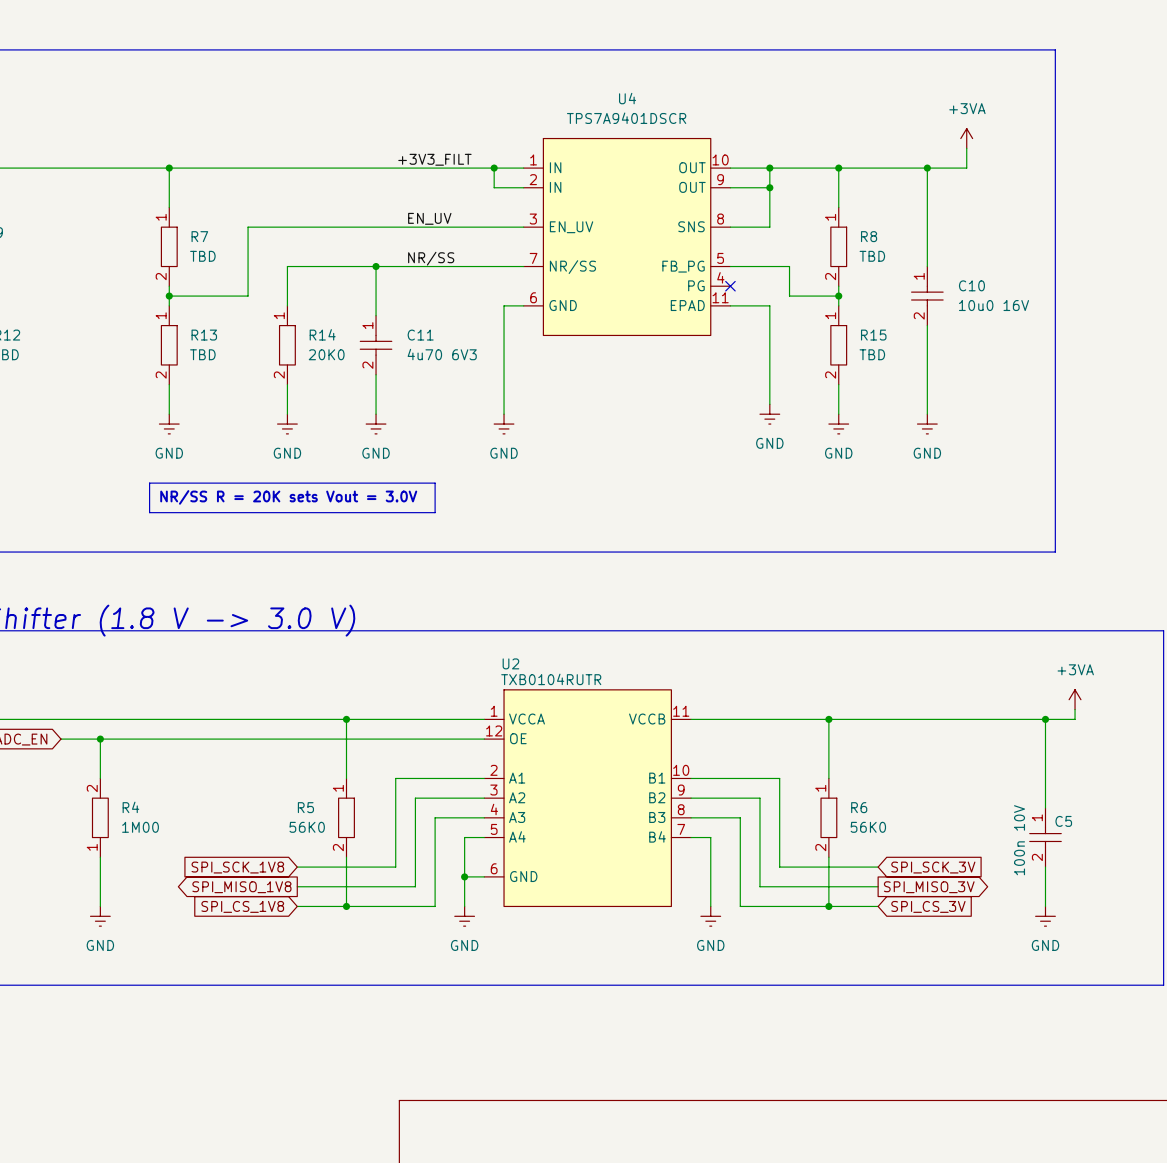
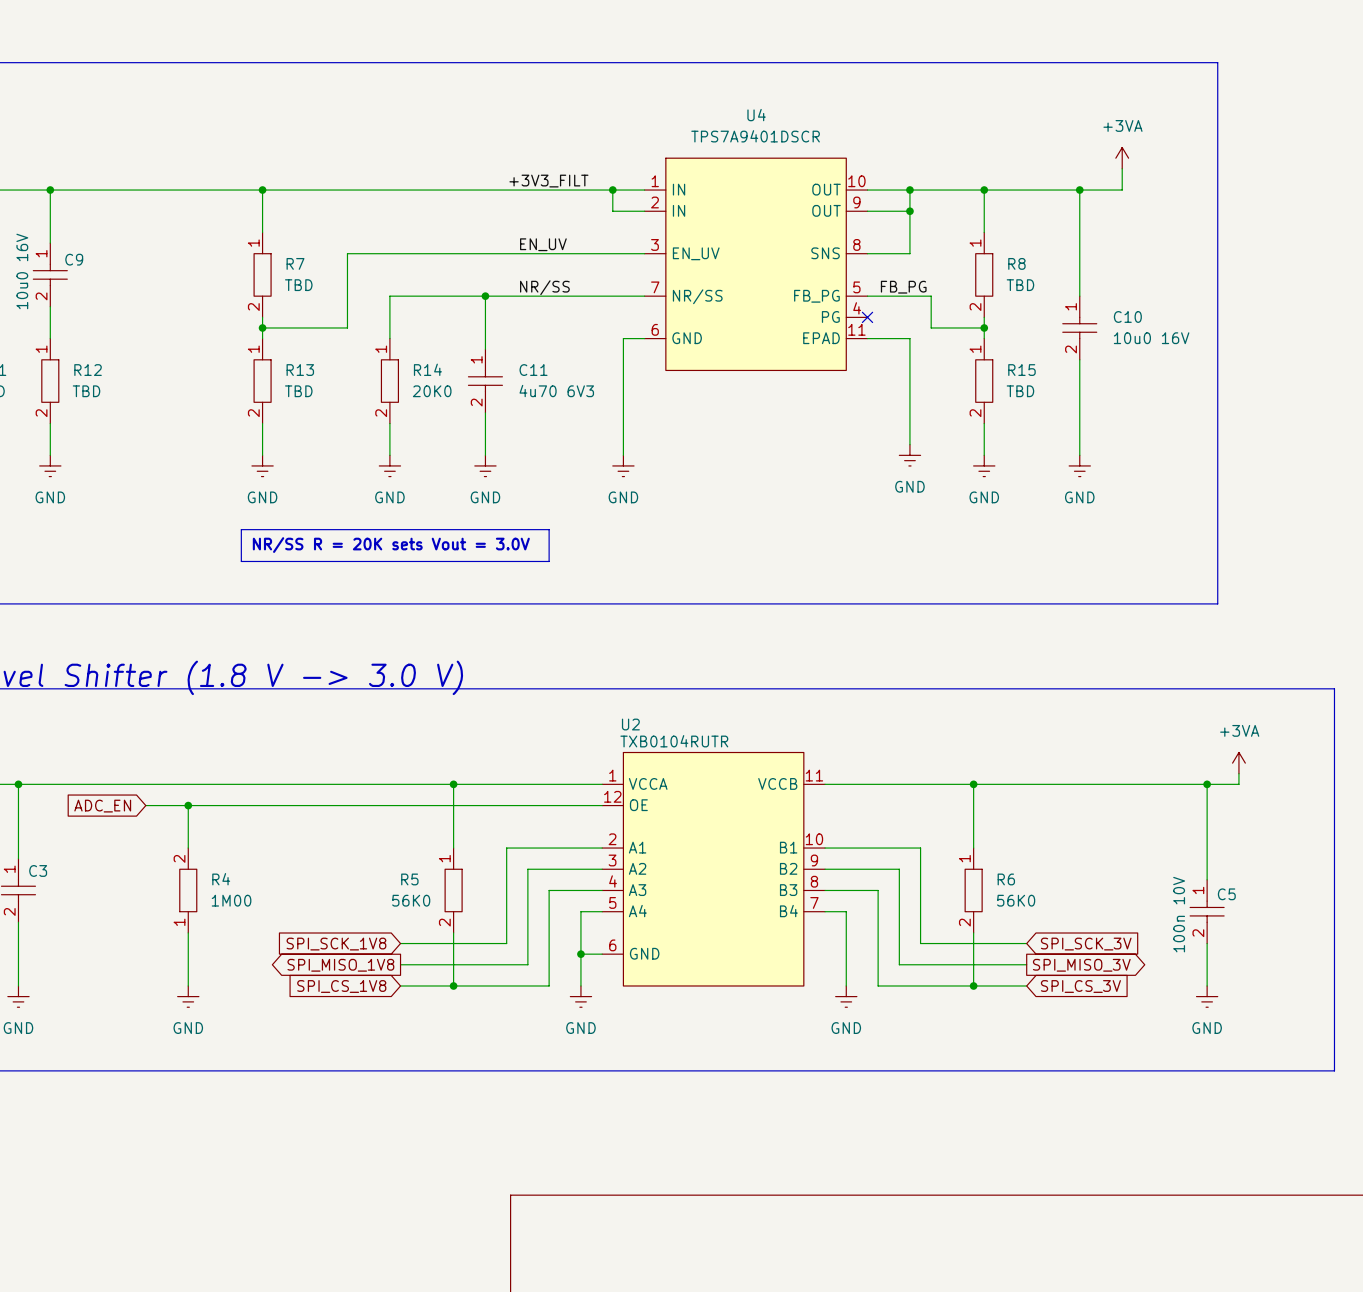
label: none -> FB_PG (903, 287)

